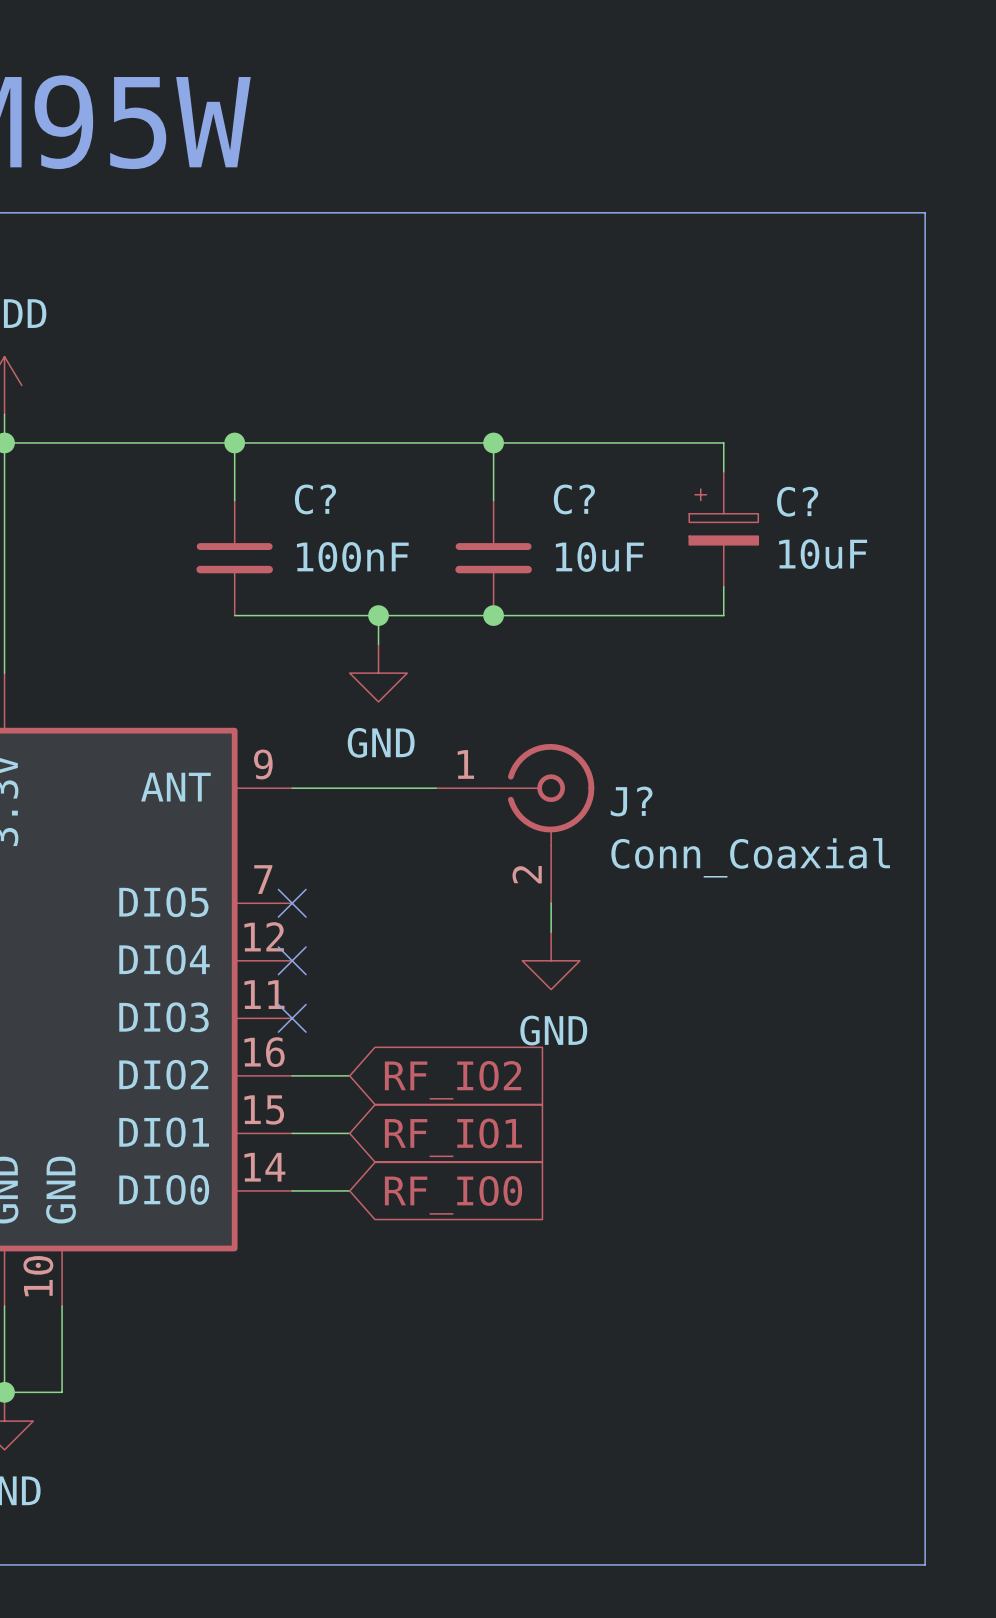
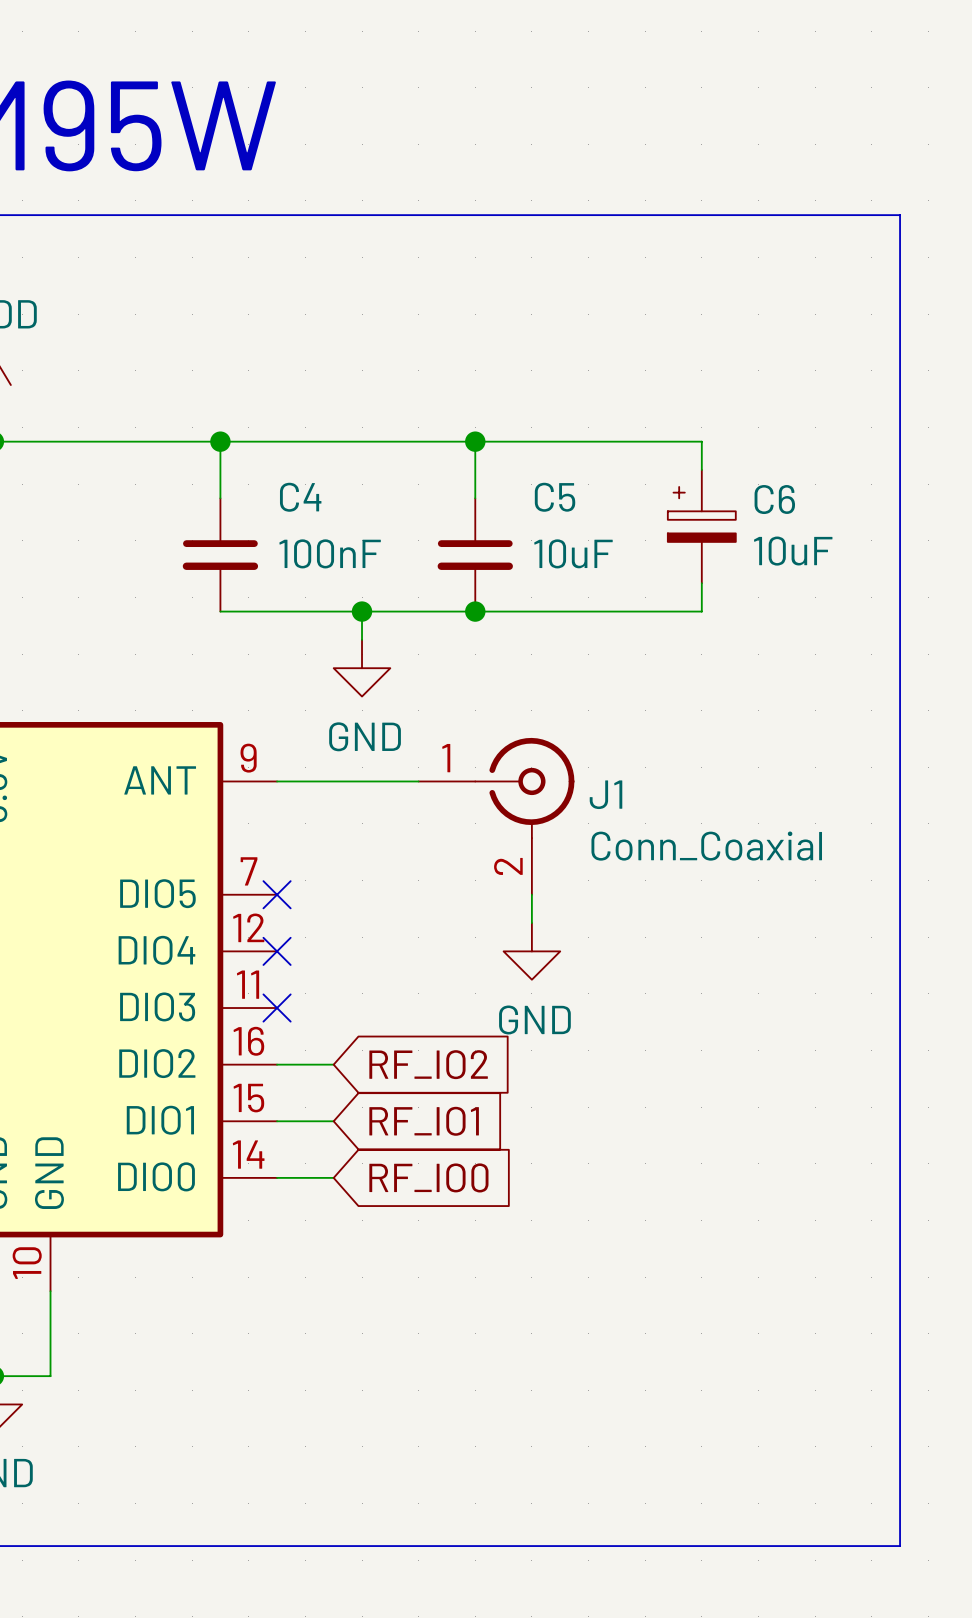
C? name: C? (315, 499) -> C4 (300, 497)
C? name: C? (574, 499) -> C5 (555, 497)
C? name: C? (797, 501) -> C6 (774, 499)
J? name: J? (631, 801) -> J1 (606, 794)

